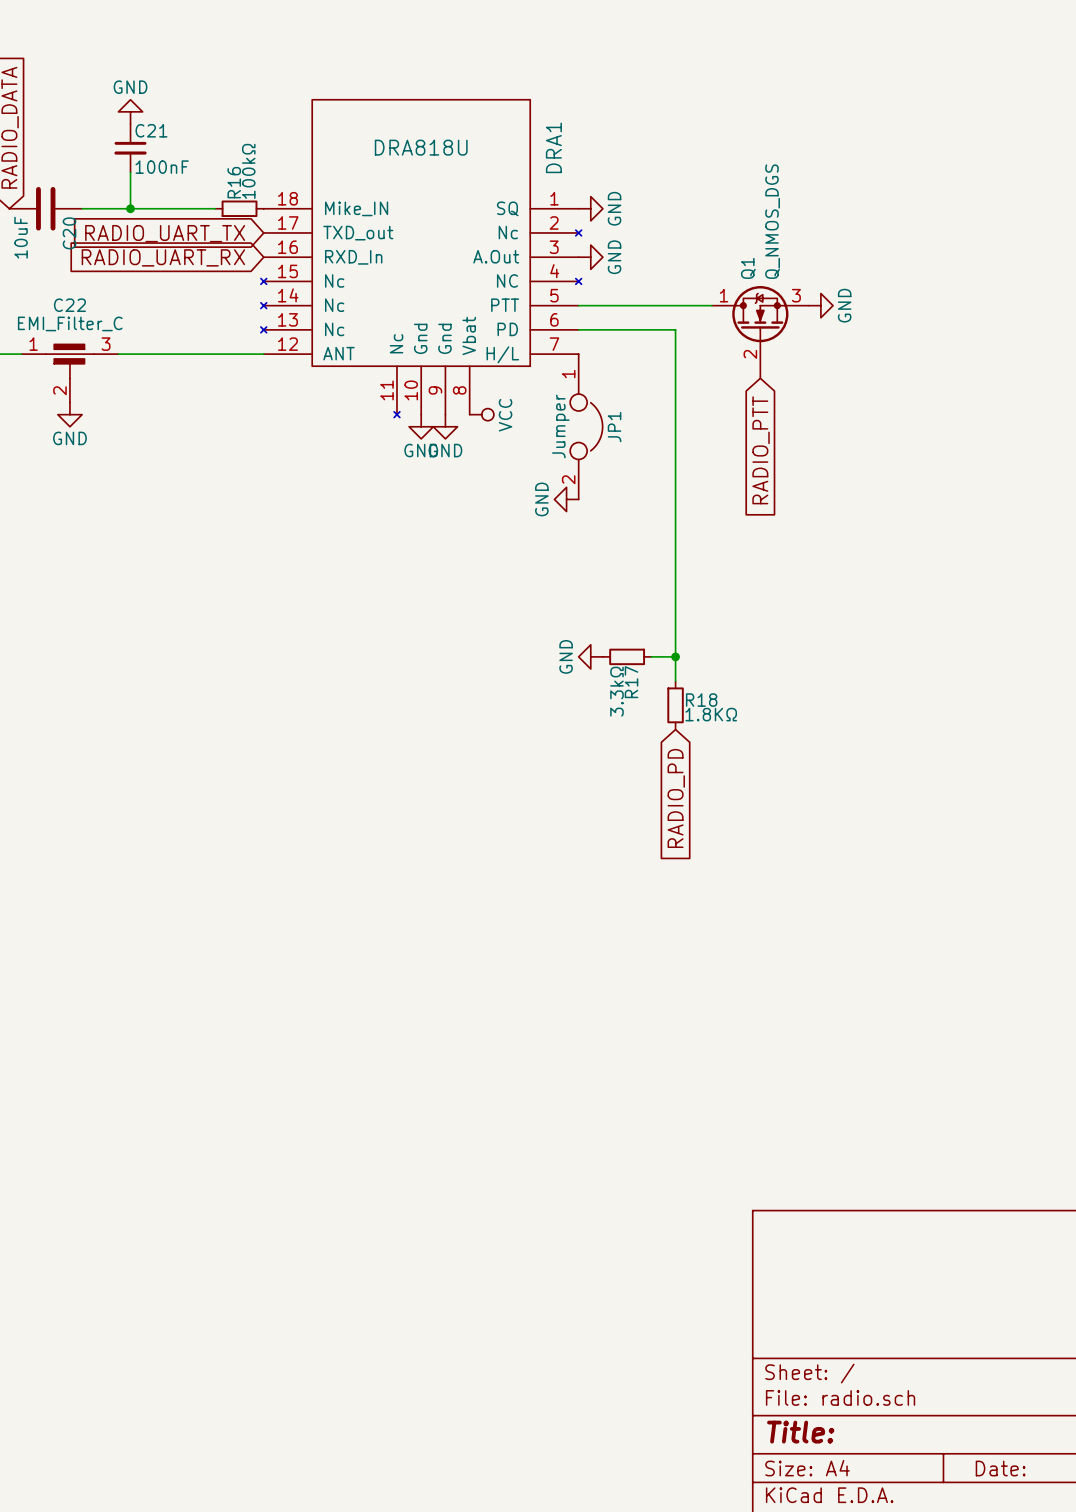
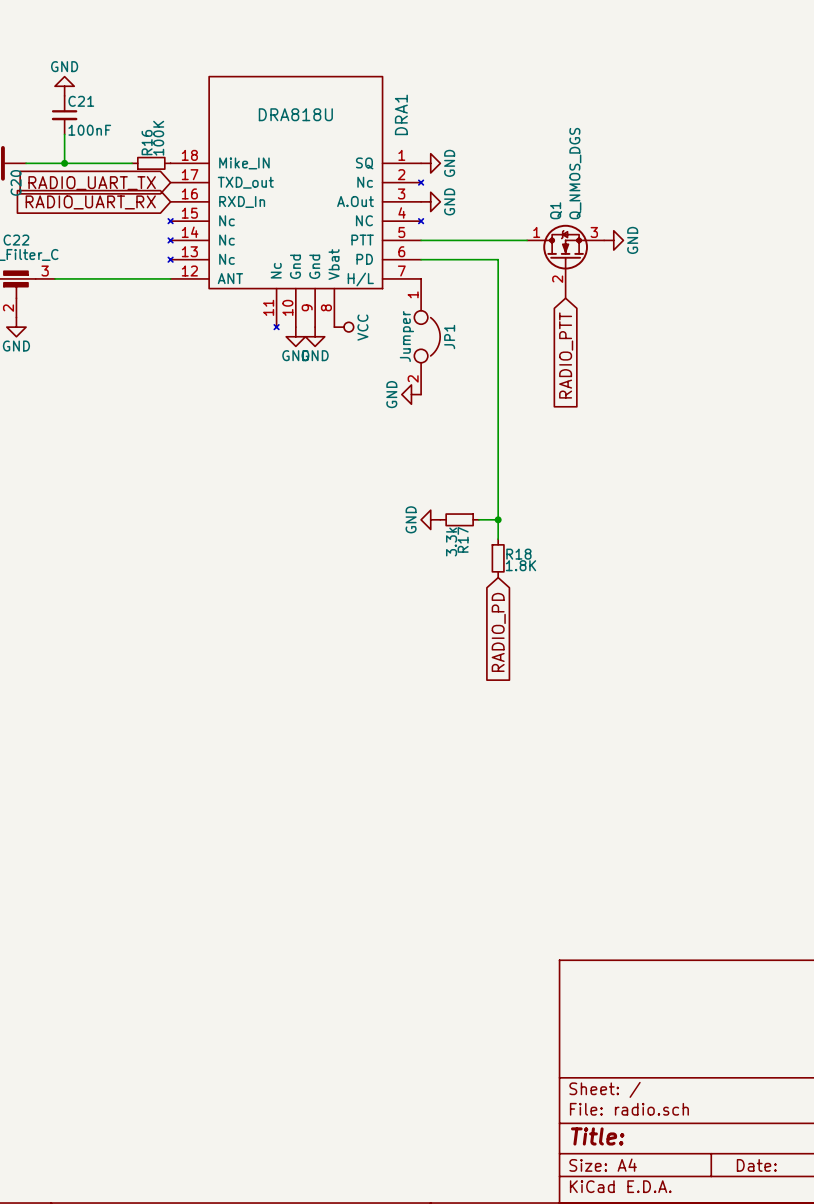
R16 value: 100kΩ (248, 171) -> 100K (158, 138)
R17 value: 3.3kΩ (616, 691) -> 3.3k (451, 541)
R18 value: 1.8KΩ (711, 714) -> 1.8K (520, 565)

